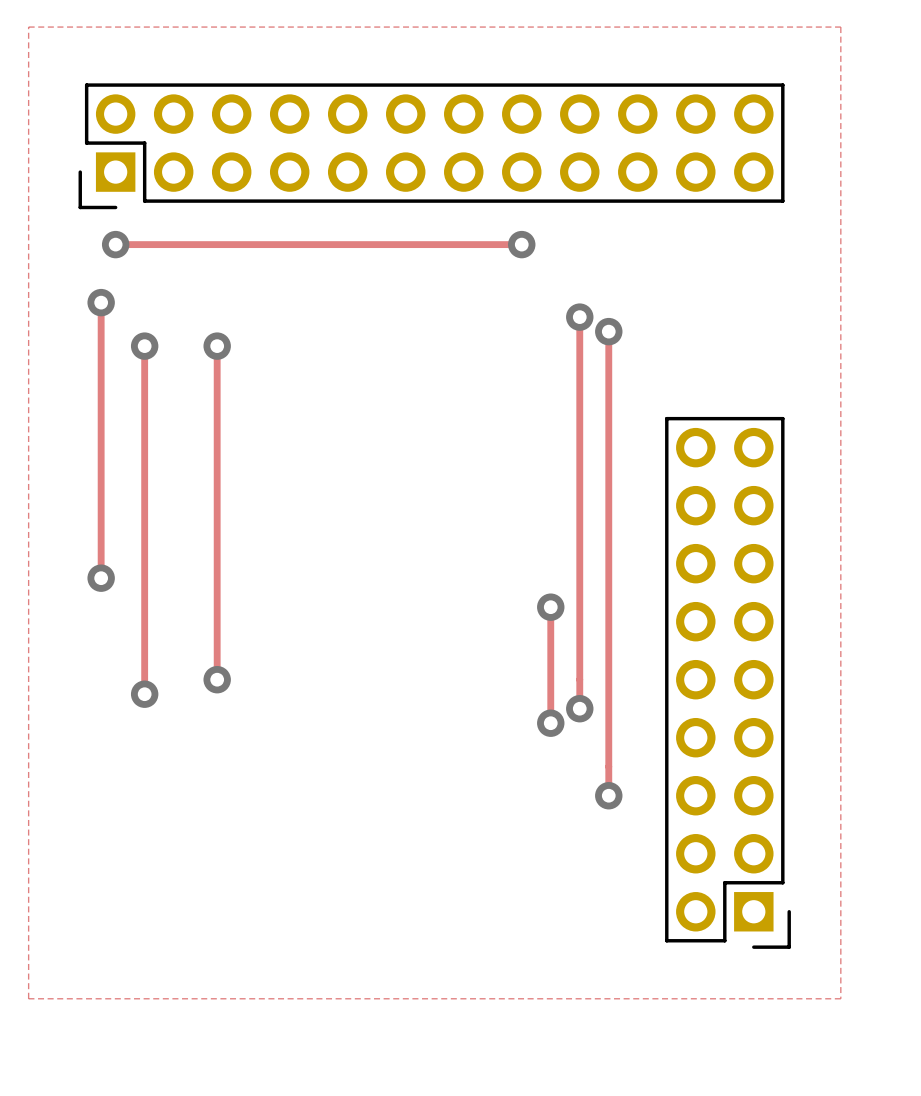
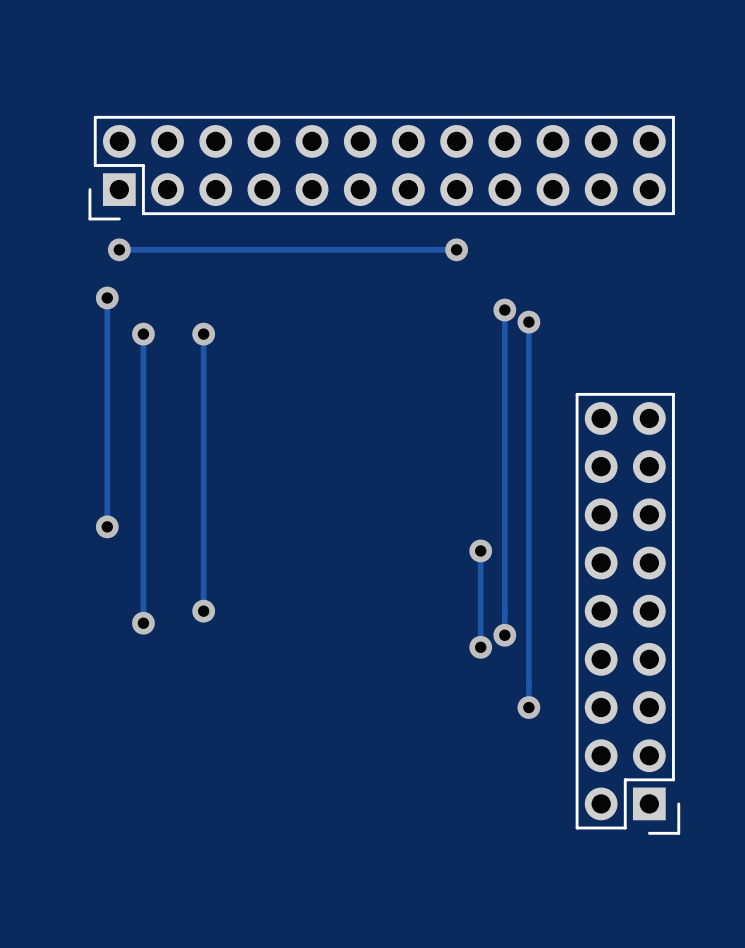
zone outline: (28, 27) (28, 998) (840, 998) (840, 27) (28, 27) -> none

